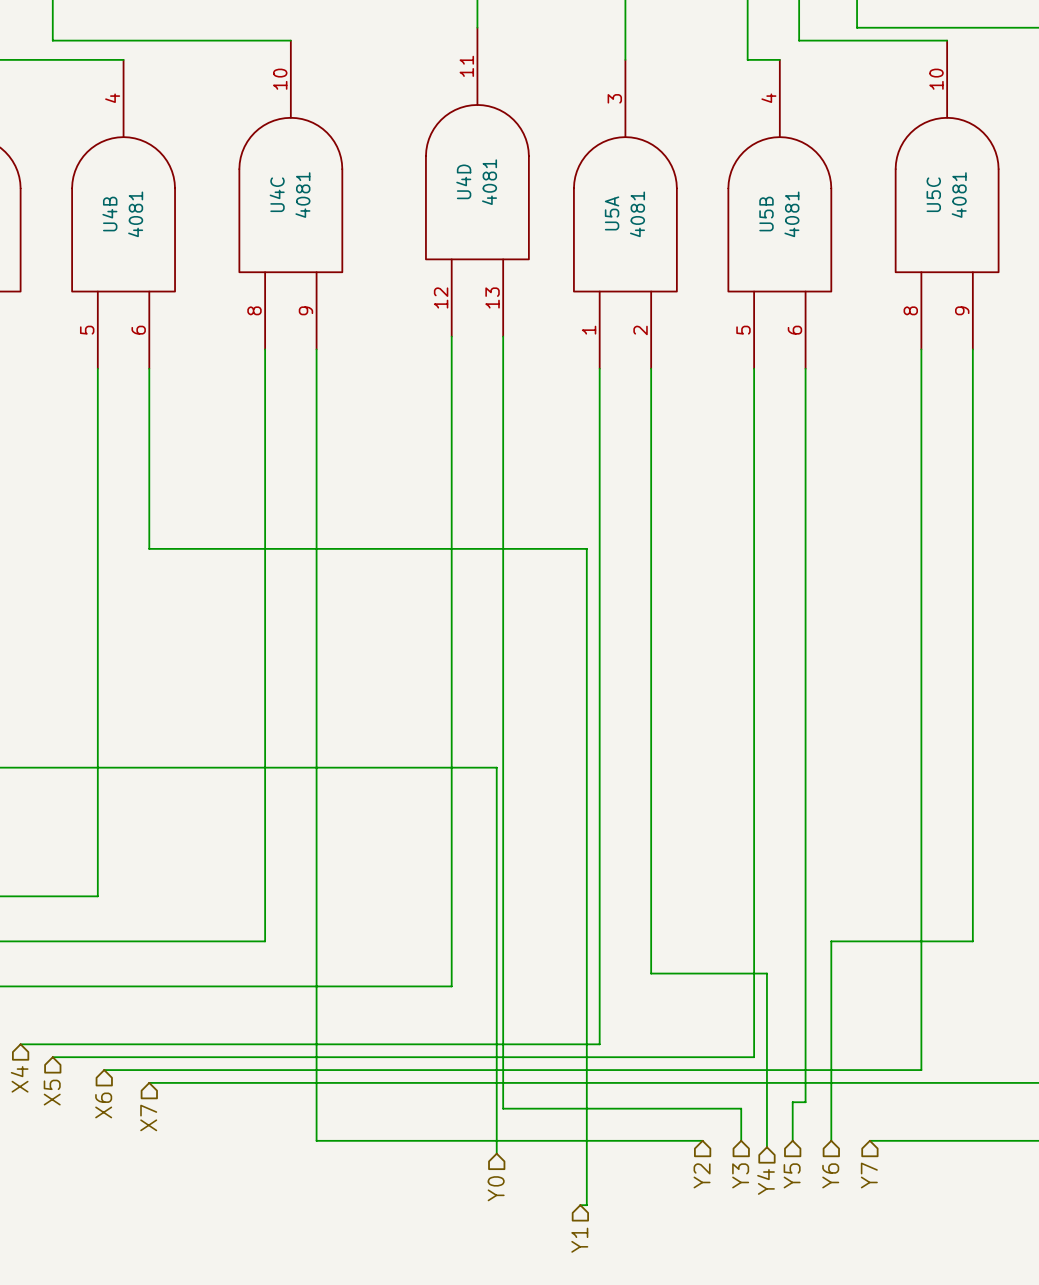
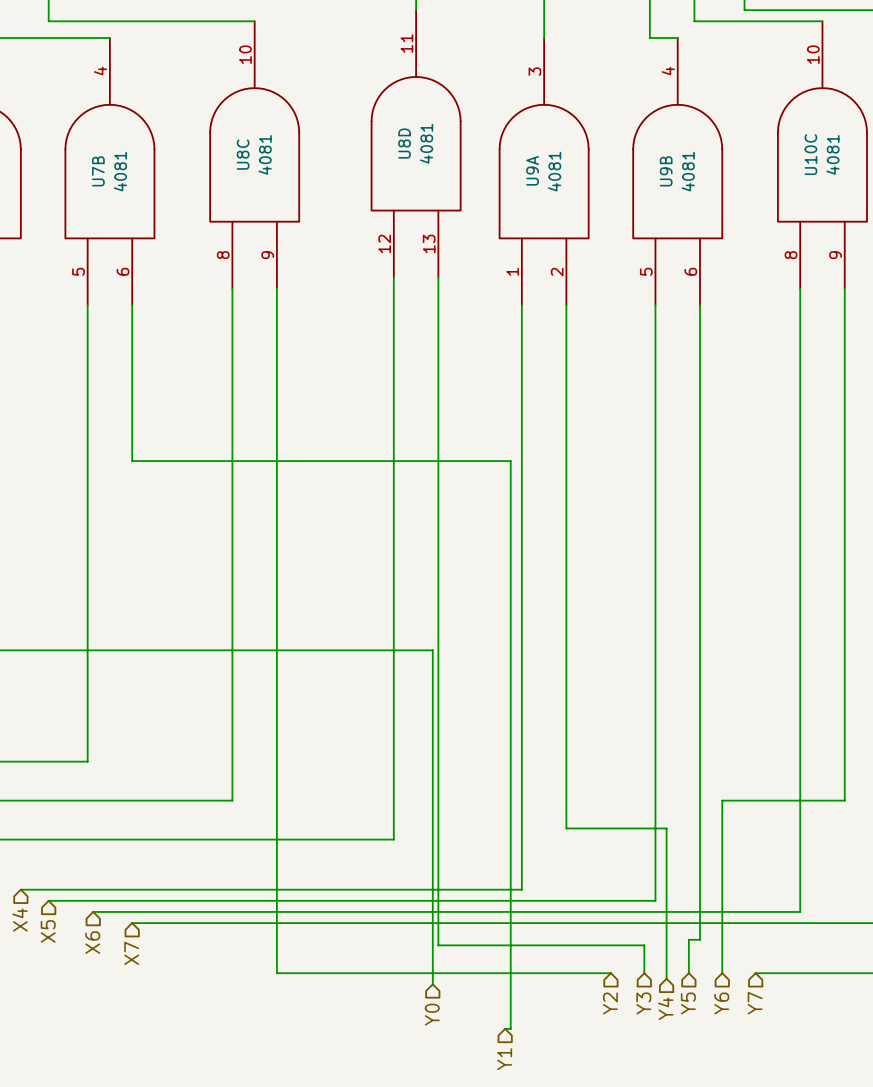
U4D name: U4D (463, 181) -> U8D (404, 143)
U4C name: U4C (277, 194) -> U8C (243, 154)
U5C name: U5C (933, 194) -> U10C (810, 154)
U5A name: U5A (612, 213) -> U9A (532, 170)
U4B name: U4B (109, 214) -> U7B (98, 171)
U5B name: U5B (766, 214) -> U9B (666, 171)

